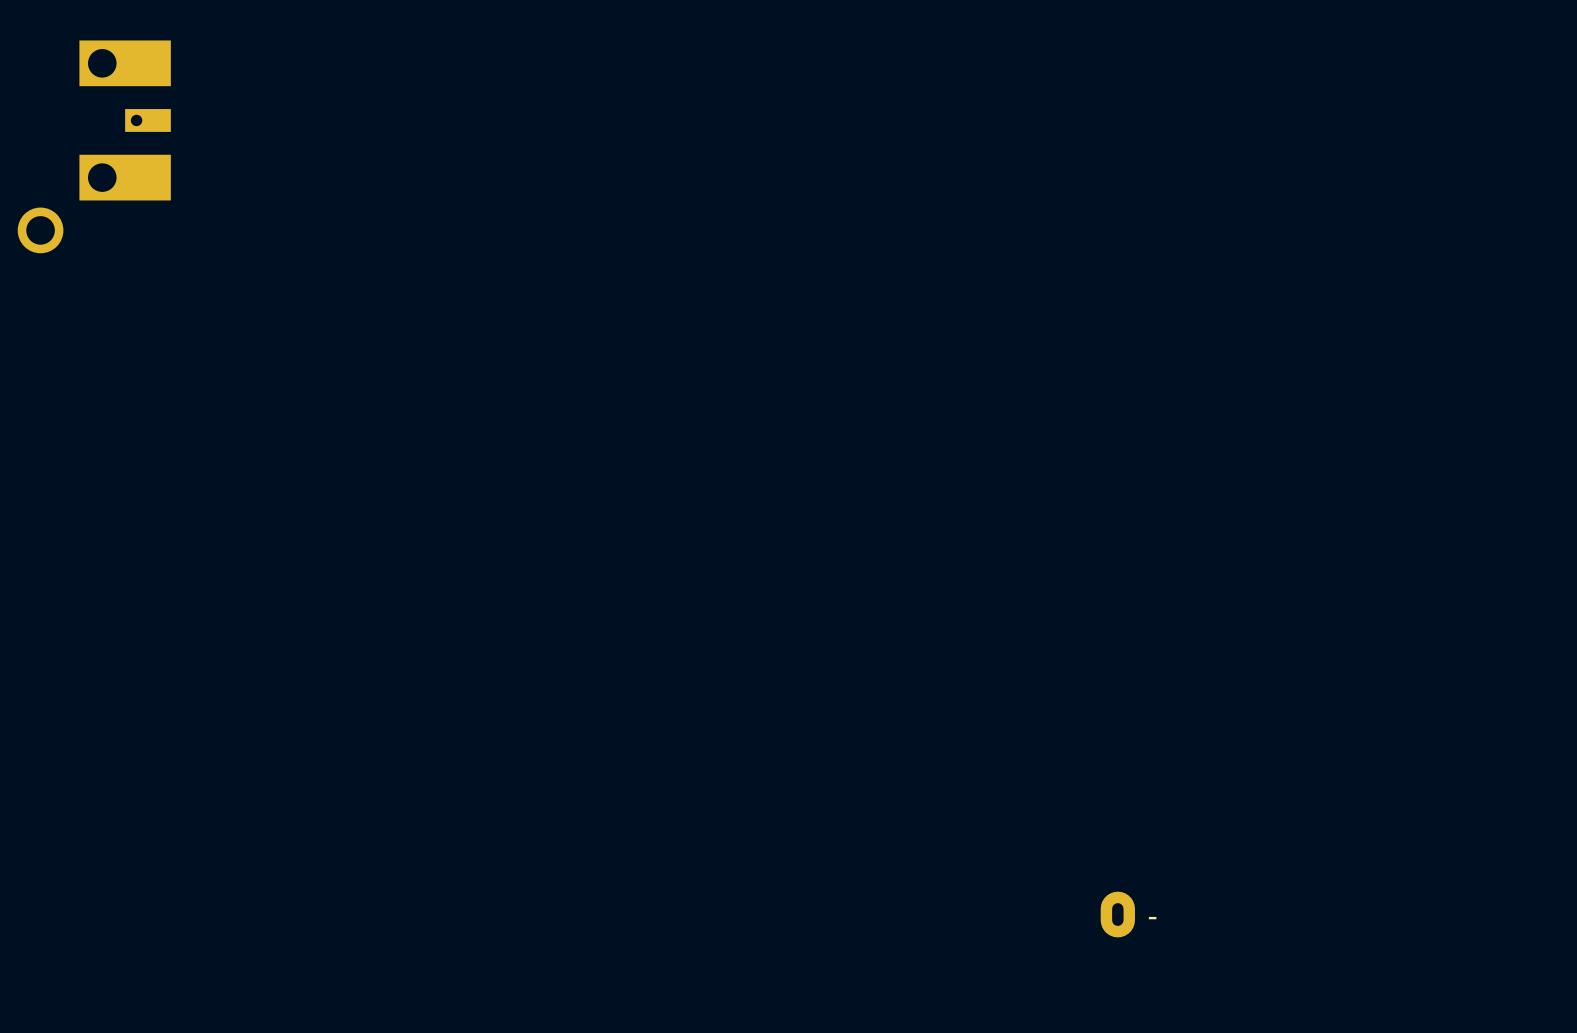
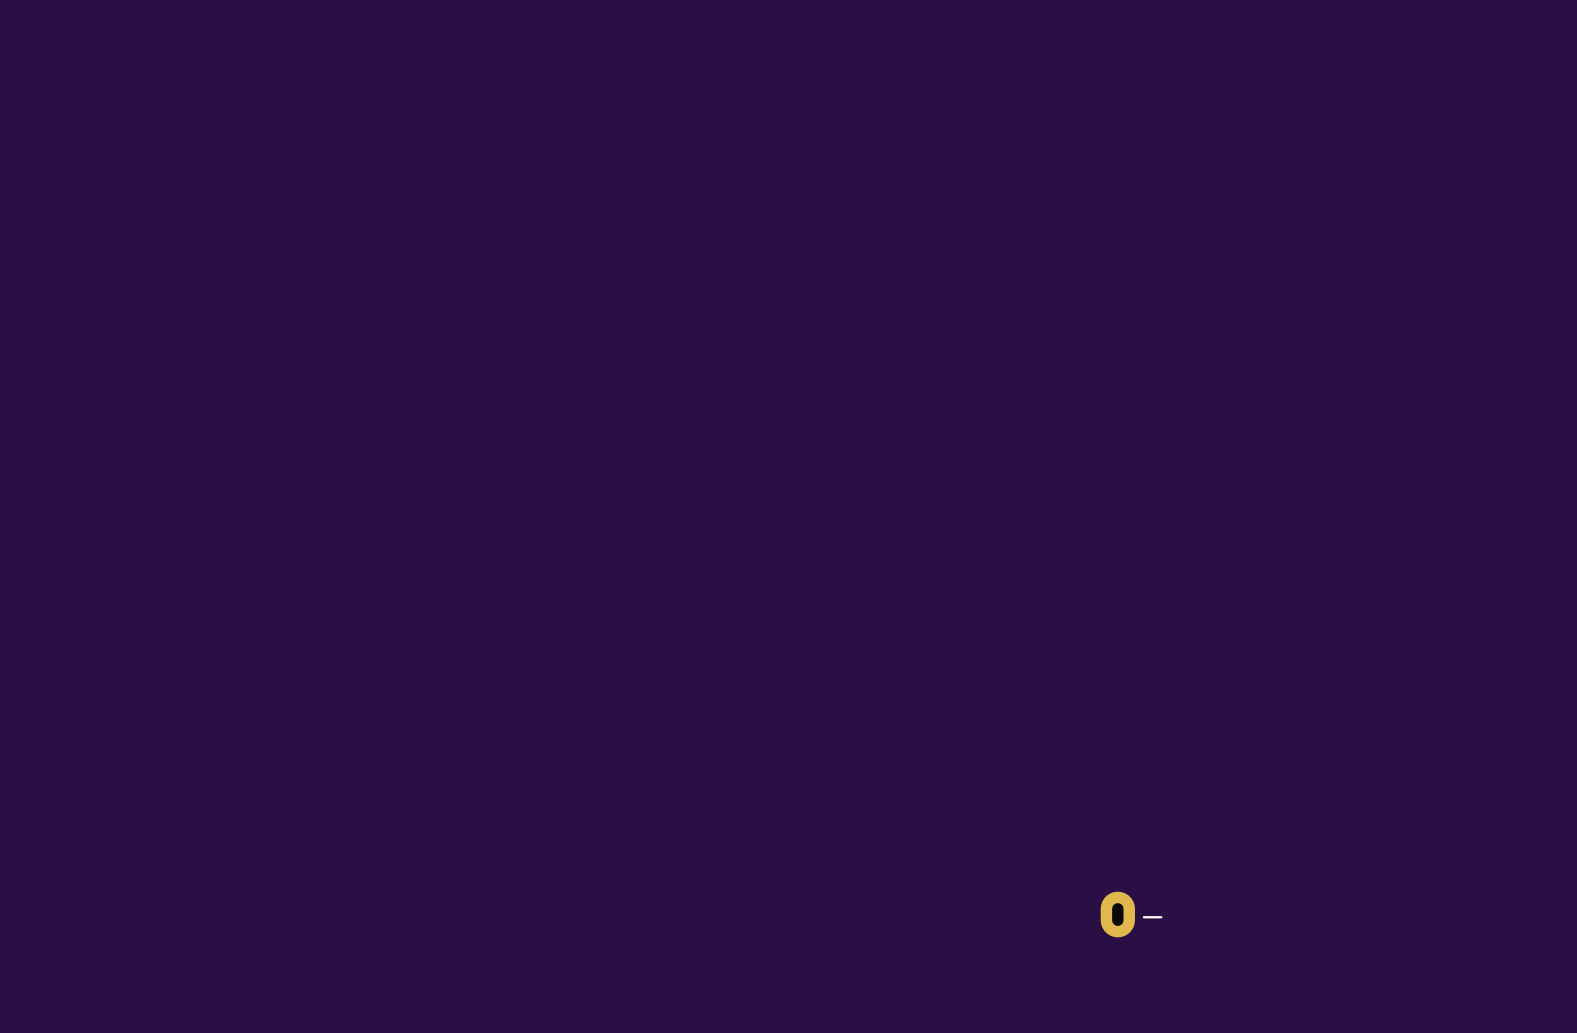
part: (125, 120) -> none
part: (40, 230) -> none

